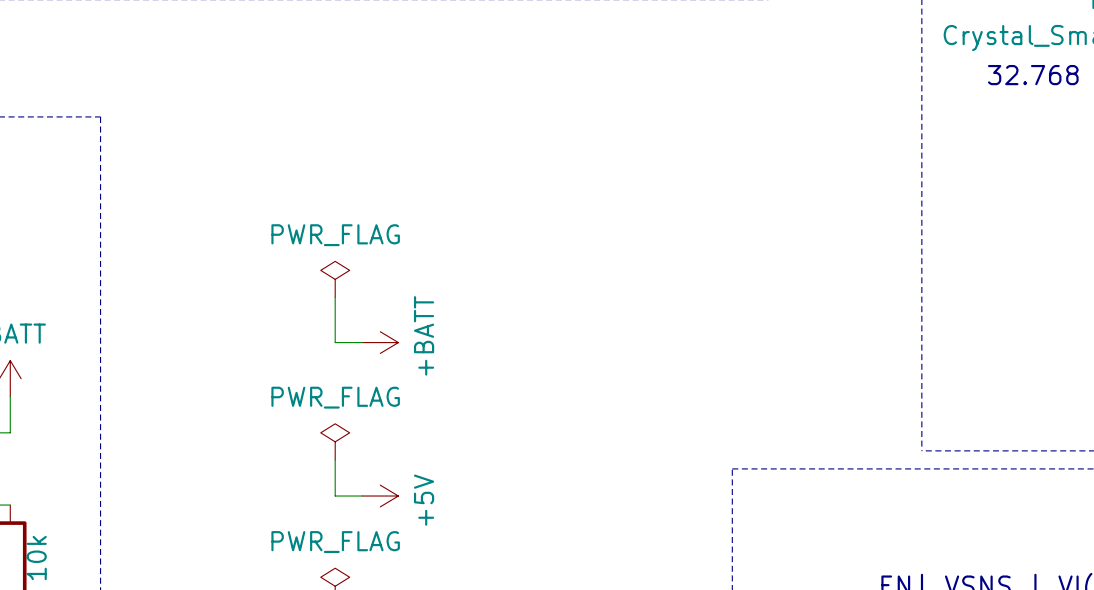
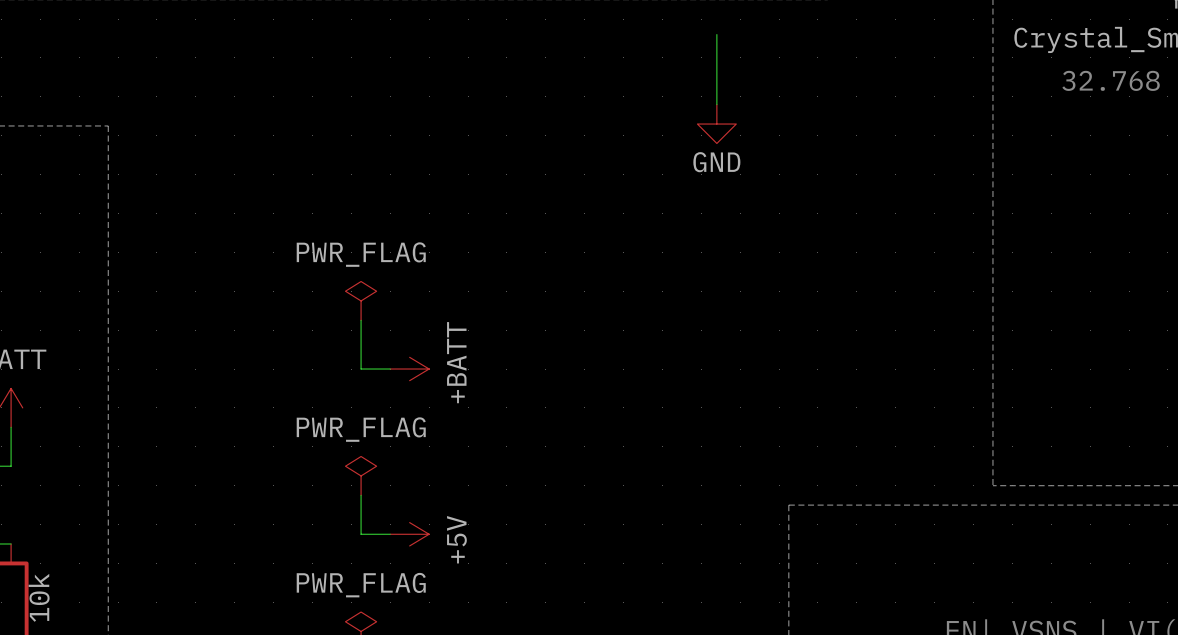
wire: none -> (716, 34) (716, 104)
power symbol: none -> GND (716, 124)

